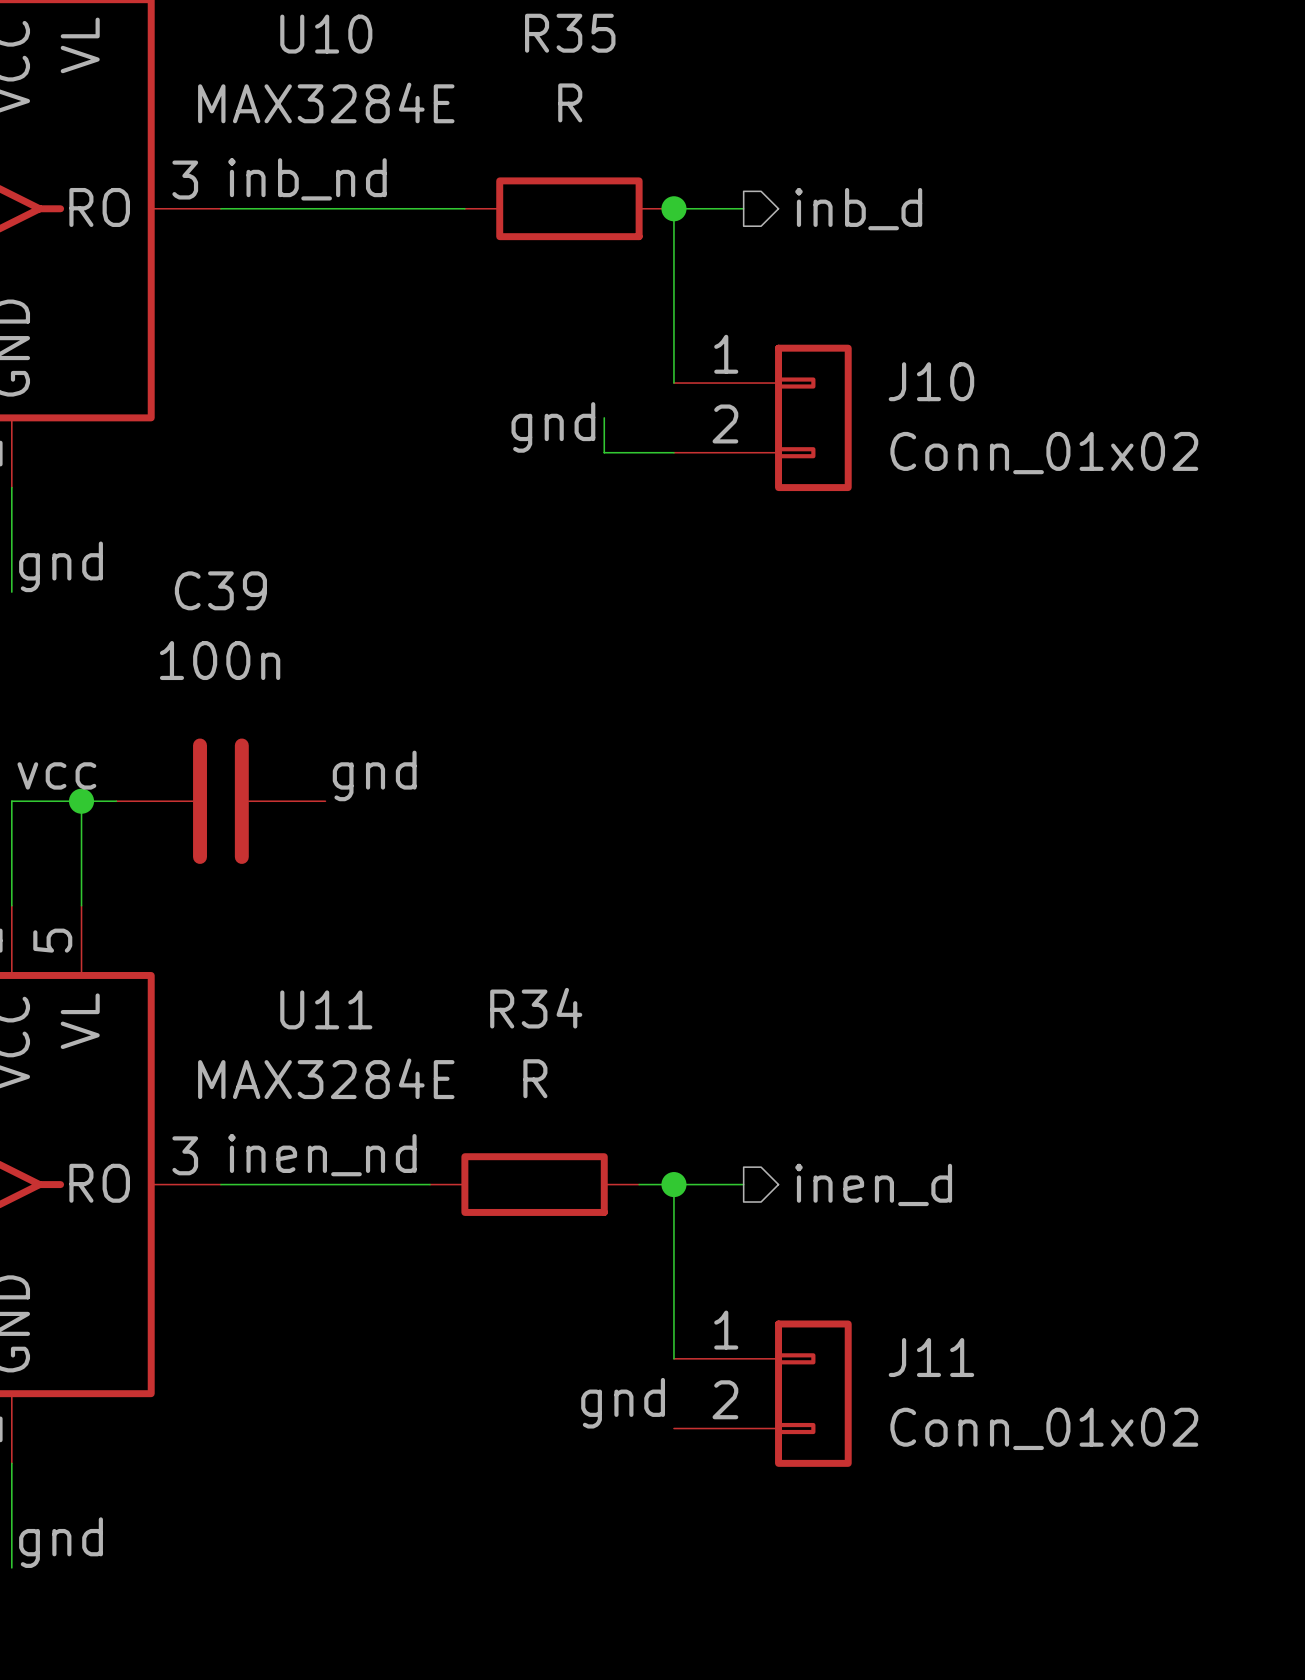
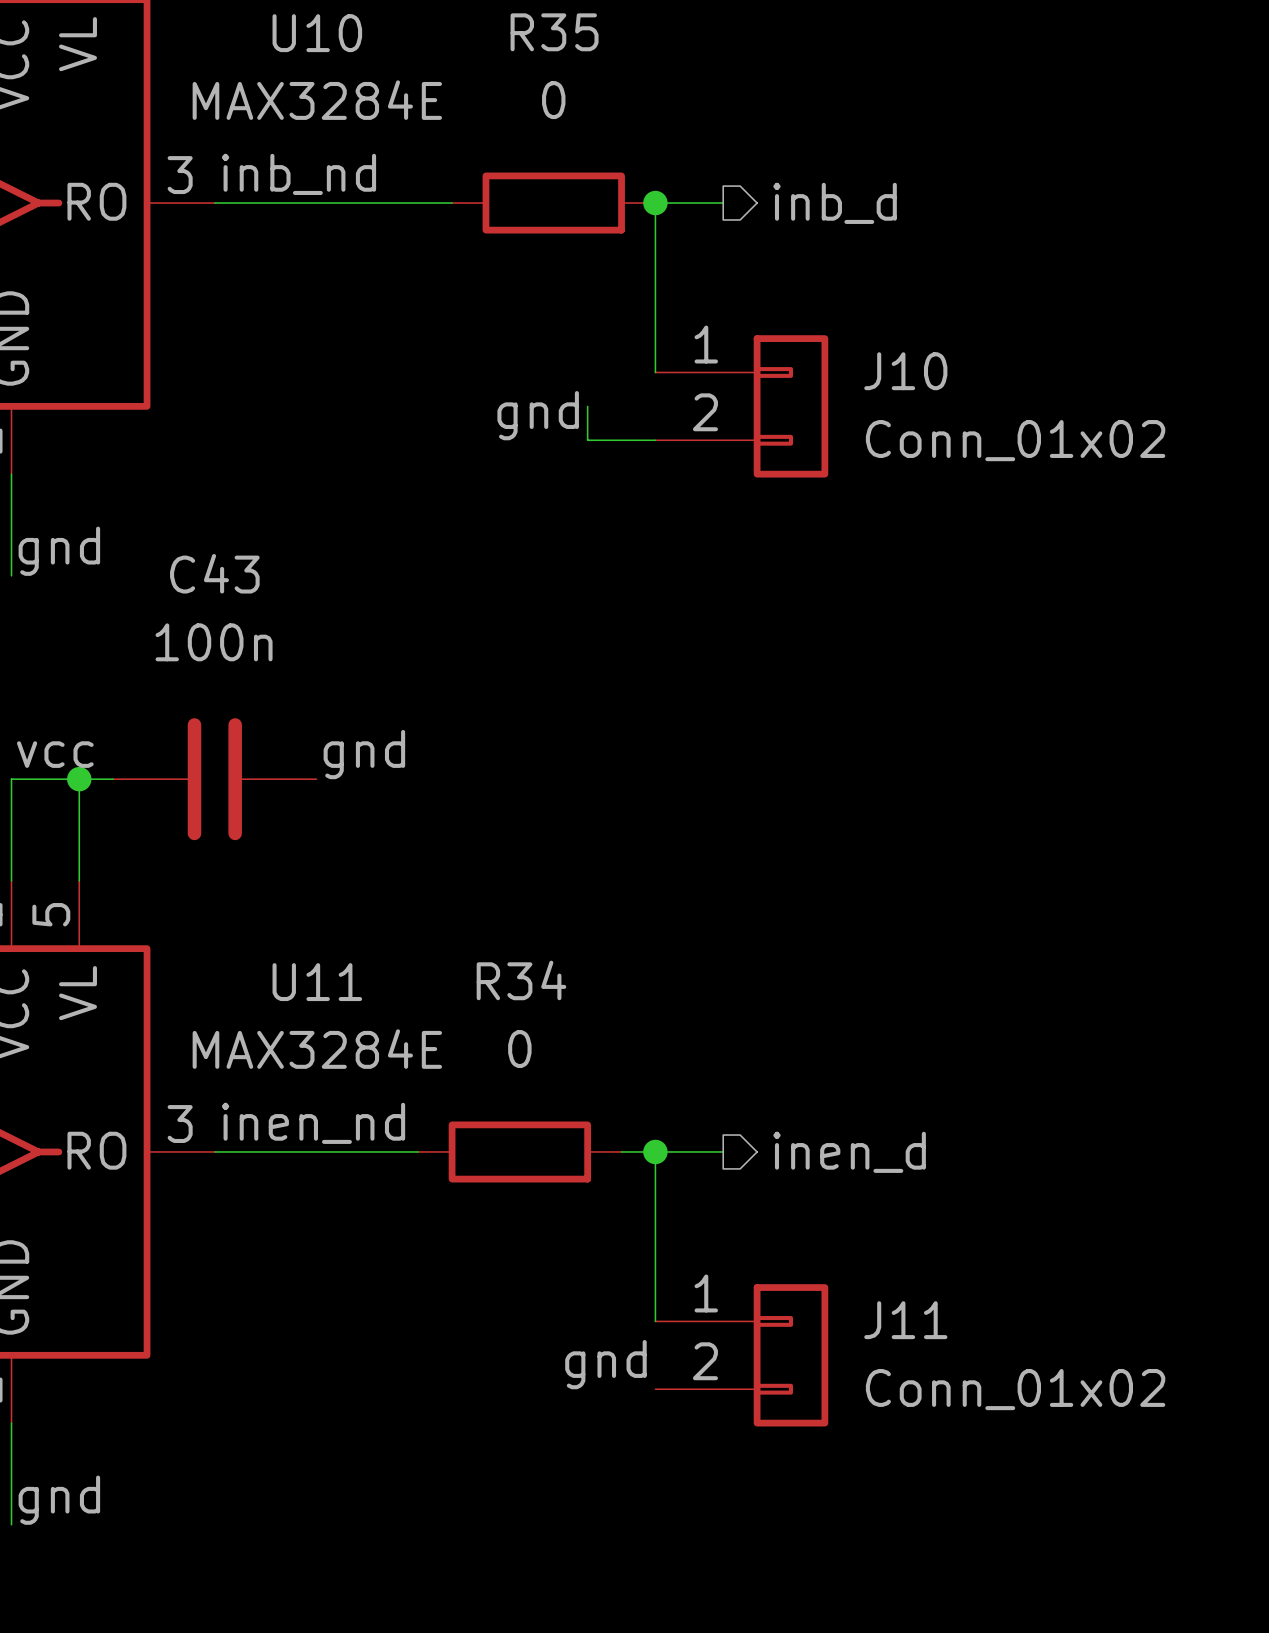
R35 value: R (570, 102) -> 0 (553, 100)
C39 name: C39 (220, 590) -> C43 (214, 573)
R34 value: R (535, 1078) -> 0 (519, 1049)

